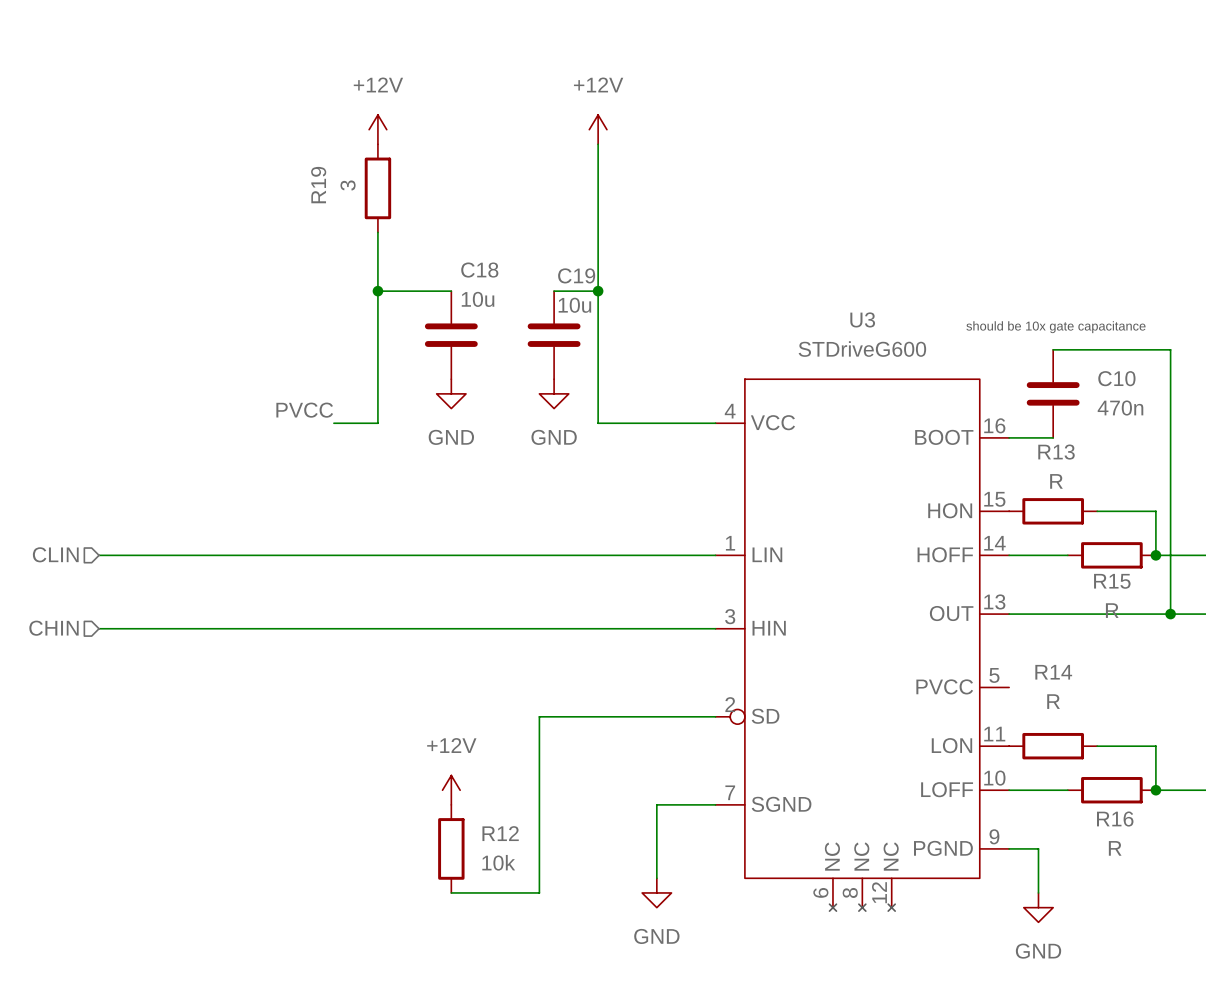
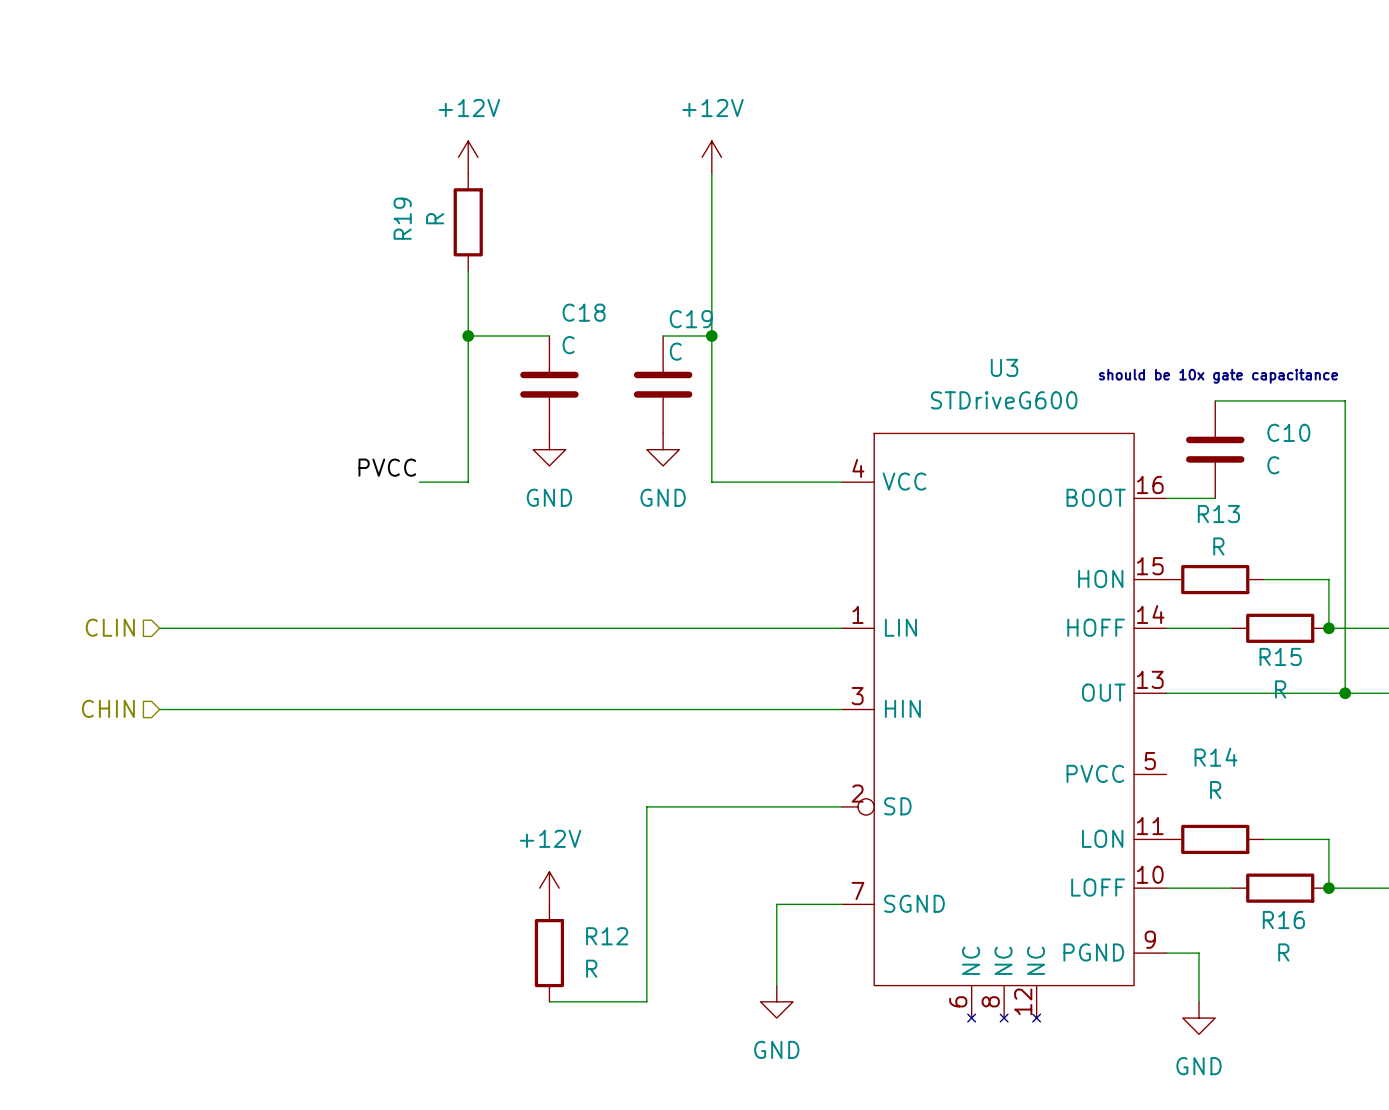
R19 value: 3 (348, 185) -> R (435, 218)
C18 value: 10u (478, 299) -> C (568, 345)
C19 value: 10u (574, 305) -> C (675, 351)
C10 value: 470n (1120, 408) -> C (1273, 465)
R12 value: 10k (498, 862) -> R (591, 968)

